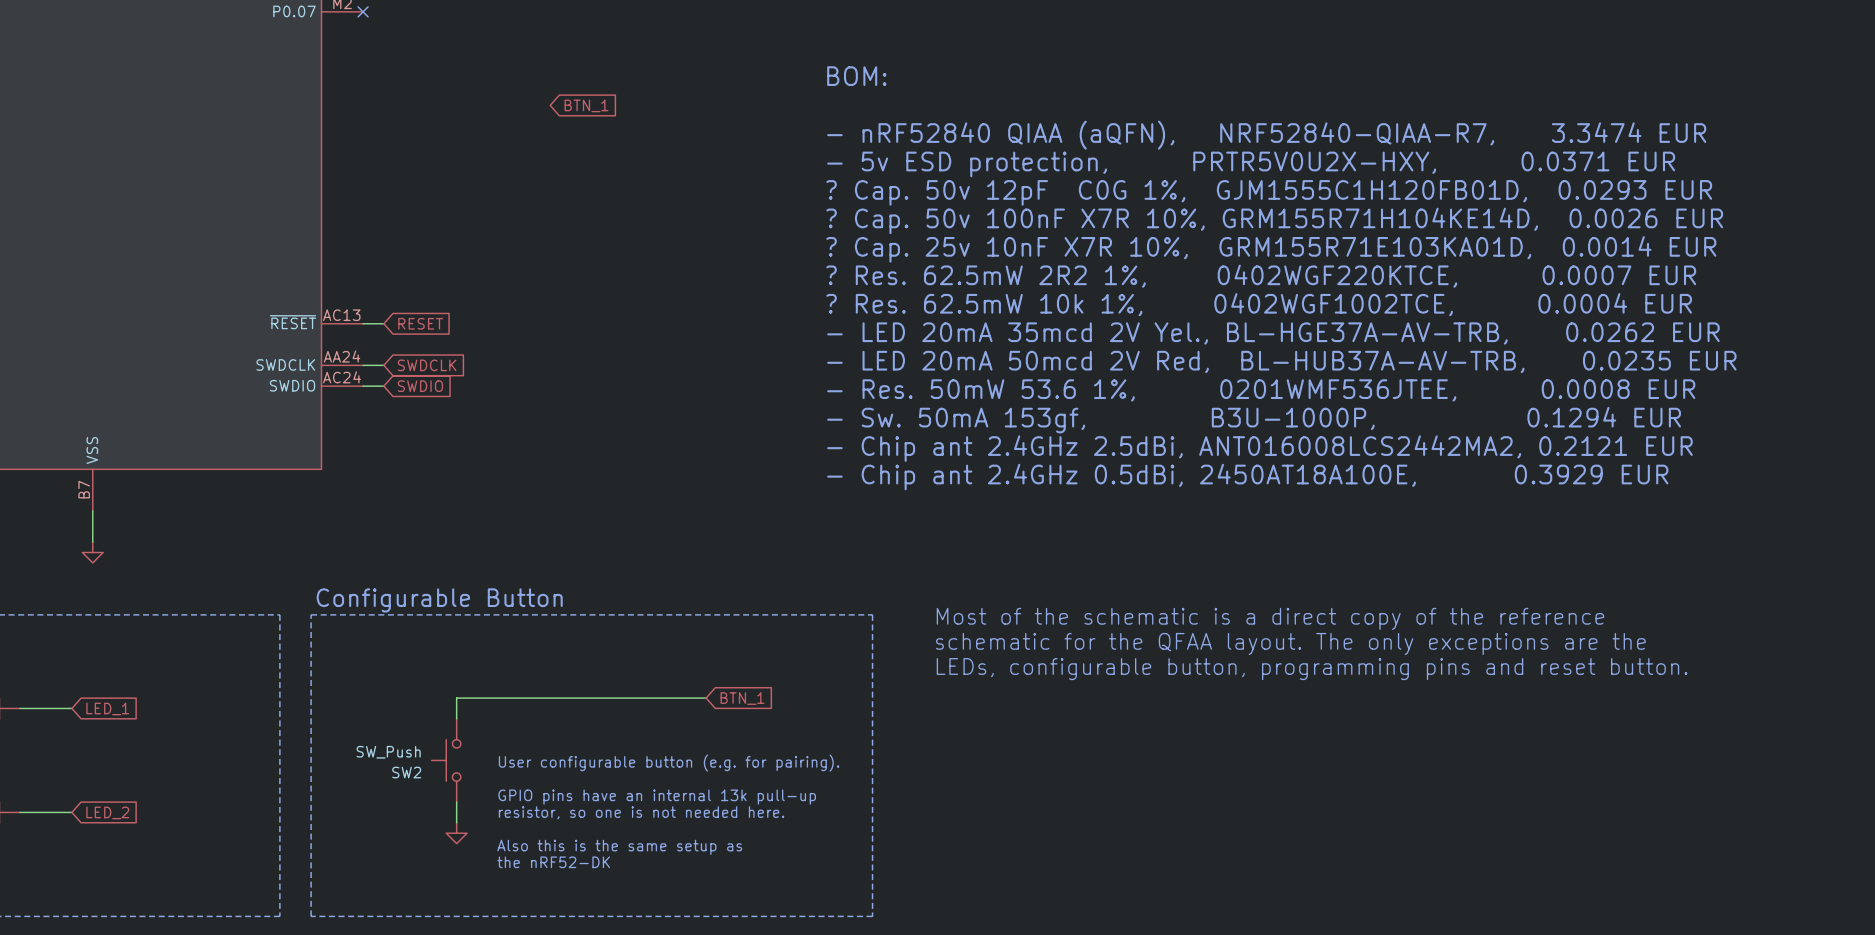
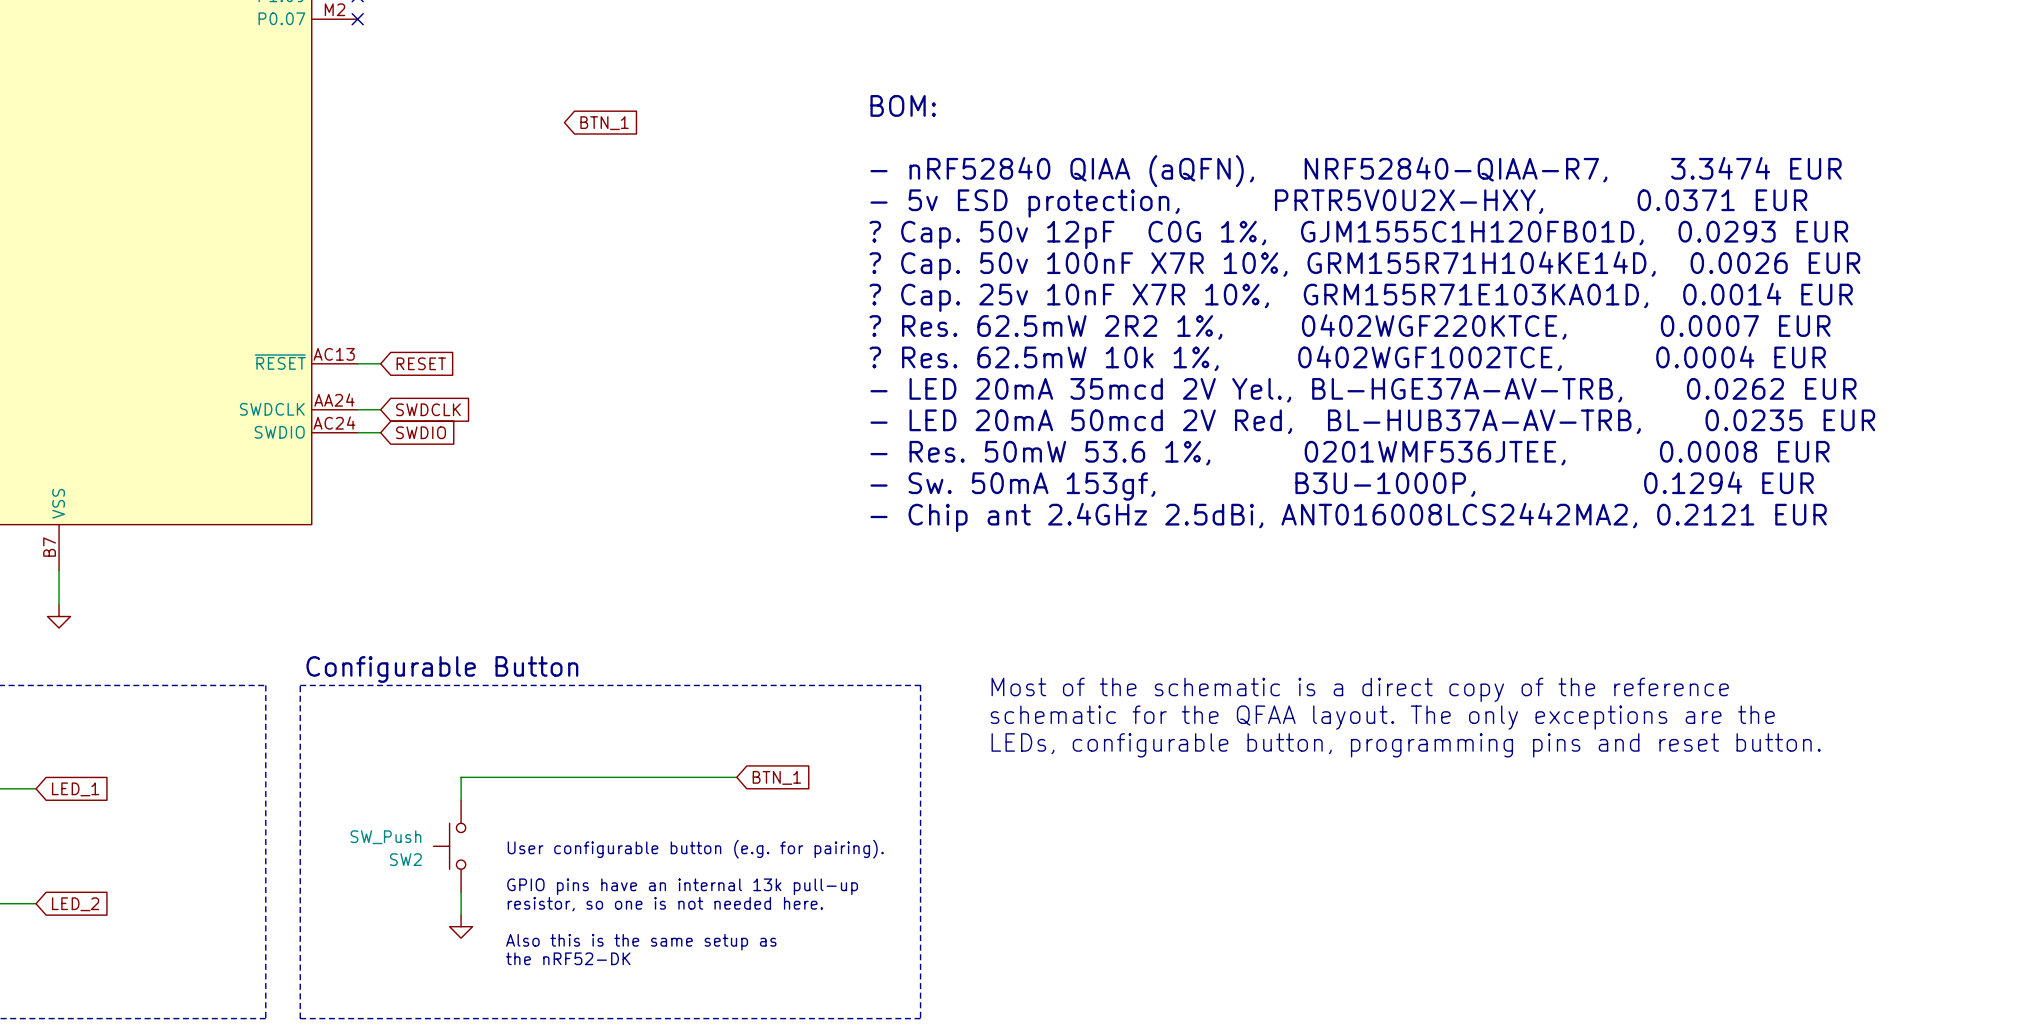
text position: BOM: (856, 76) -> BOM: (903, 105)
text position: - nRF52840 QIAA (aQFN), NRF52840-QIAA-R7, 3.3474 EUR (1266, 135) -> - nRF52840 QIAA (aQFN), NRF52840-QIAA-R7, 3.3474 EUR (1356, 171)
text position: - 5v ESD protection, PRTR5V0U2X-HXY, 0.0371 EUR (1251, 164) -> - 5v ESD protection, PRTR5V0U2X-HXY, 0.0371 EUR (1338, 203)
text position: ? Cap. 50v 12pF C0G 1%, GJM1555C1H120FB01D, 0.0293 EUR (1269, 192) -> ? Cap. 50v 12pF C0G 1%, GJM1555C1H120FB01D, 0.0293 EUR (1358, 234)
text position: ? Cap. 50v 100nF X7R 10%, GRM155R71H104KE14D, 0.0026 EUR (1274, 220) -> ? Cap. 50v 100nF X7R 10%, GRM155R71H104KE14D, 0.0026 EUR (1364, 265)
text position: ? Cap. 25v 10nF X7R 10%, GRM155R71E103KA01D, 0.0014 EUR (1271, 249) -> ? Cap. 25v 10nF X7R 10%, GRM155R71E103KA01D, 0.0014 EUR (1361, 297)
text position: ? Res. 62.5mW 2R2 1%, 0402WGF220KTCE, 0.0007 EUR (1261, 276) -> ? Res. 62.5mW 2R2 1%, 0402WGF220KTCE, 0.0007 EUR (1350, 326)
text position: ? Res. 62.5mW 10k 1%, 0402WGF1002TCE, 0.0004 EUR (1259, 304) -> ? Res. 62.5mW 10k 1%, 0402WGF1002TCE, 0.0004 EUR (1347, 358)
text position: - LED 20mA 35mcd 2V Yel., BL-HGE37A-AV-TRB, 0.0262 EUR (1273, 333) -> - LED 20mA 35mcd 2V Yel., BL-HGE37A-AV-TRB, 0.0262 EUR (1363, 390)
text position: - LED 20mA 50mcd 2V Red, BL-HUB37A-AV-TRB, 0.0235 EUR (1281, 361) -> - LED 20mA 50mcd 2V Red, BL-HUB37A-AV-TRB, 0.0235 EUR (1372, 421)
text position: - Res. 50mW 53.6 1%, 0201WMF536JTEE, 0.0008 EUR (1261, 390) -> - Res. 50mW 53.6 1%, 0201WMF536JTEE, 0.0008 EUR (1350, 453)
text position: - Sw. 50mA 153gf, B3U-1000P, 0.1294 EUR (1254, 420) -> - Sw. 50mA 153gf, B3U-1000P, 0.1294 EUR (1342, 486)
text position: - Chip ant 2.4GHz 2.5dBi, ANT016008LCS2442MA2, 0.2121 EUR (1259, 448) -> - Chip ant 2.4GHz 2.5dBi, ANT016008LCS2442MA2, 0.2121 EUR (1348, 517)
text: - Chip ant 2.4GHz 0.5dBi, 2450AT18A100E, 0.3929 EUR (1247, 477) -> none

